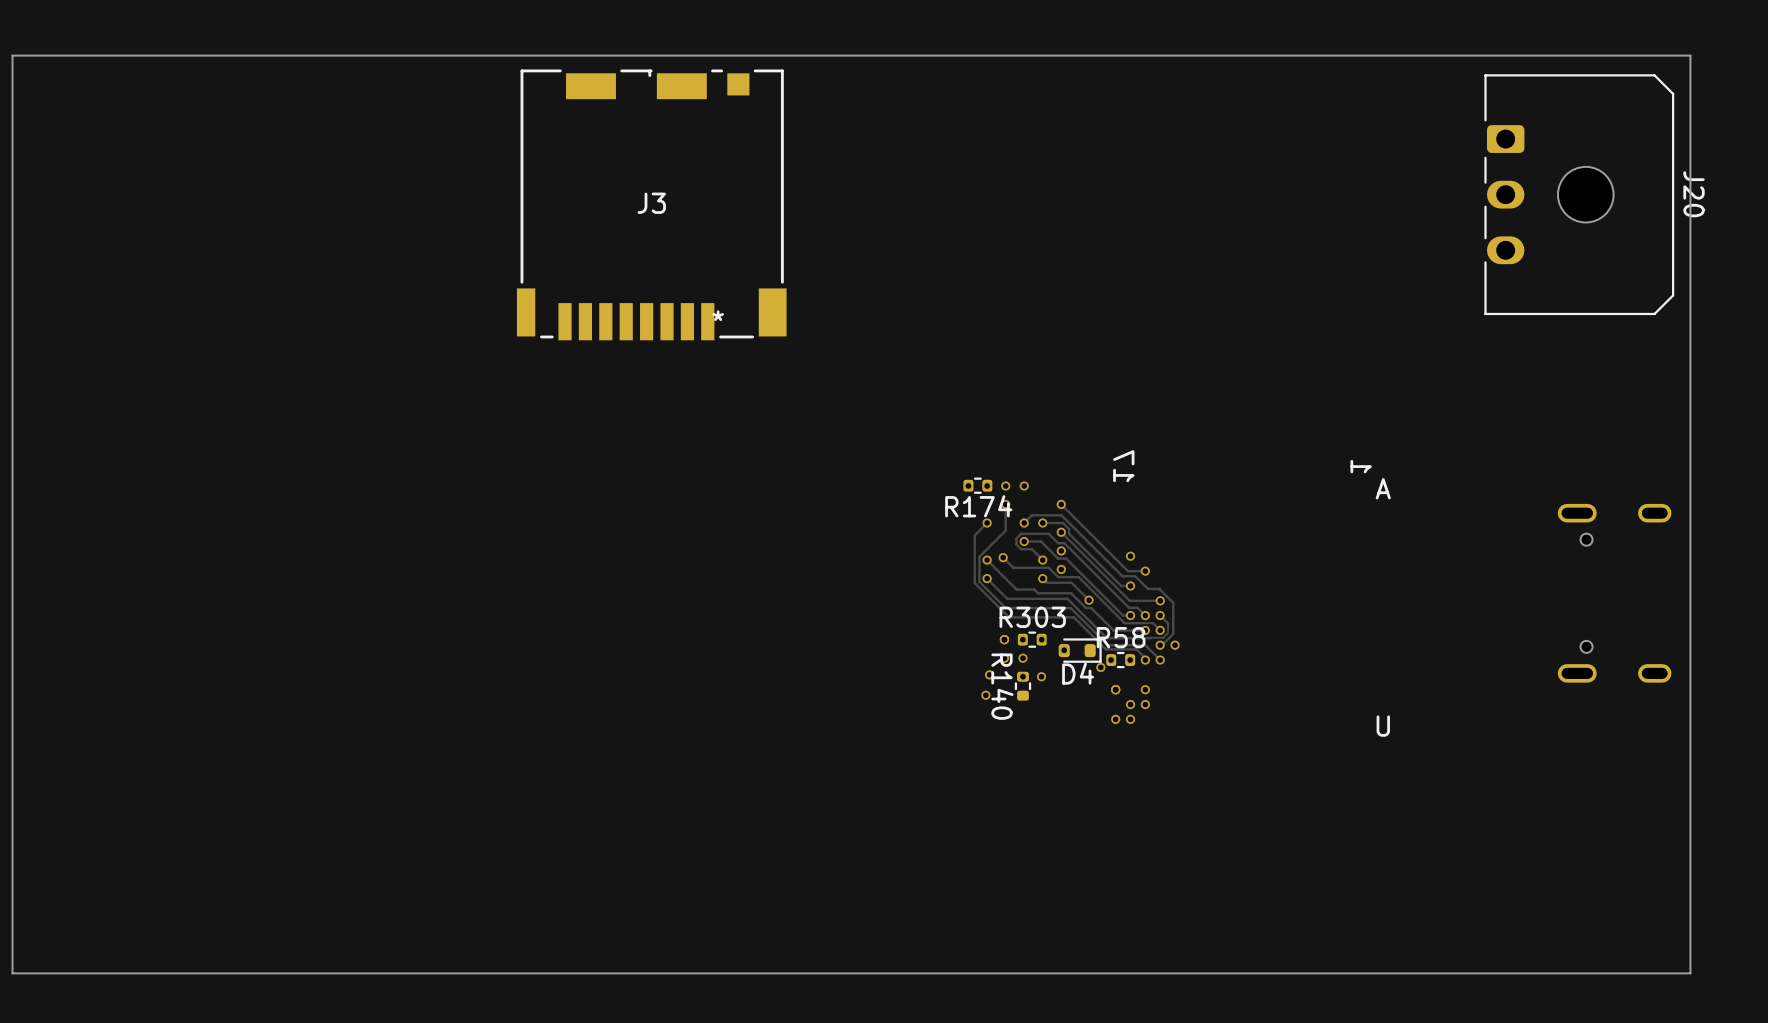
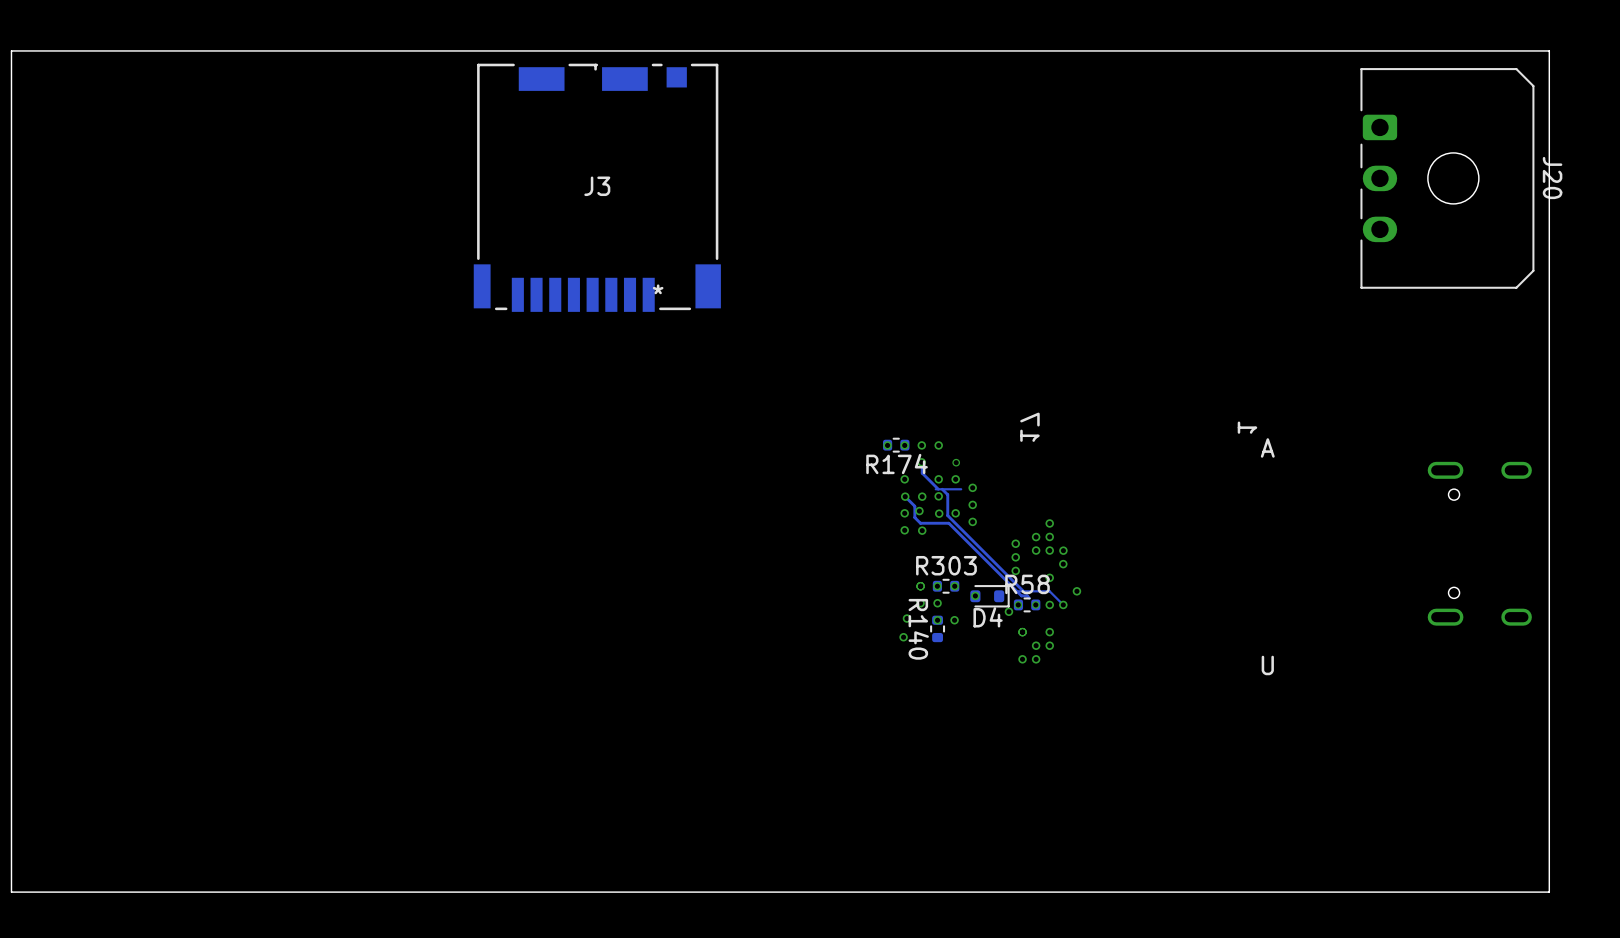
track: (1005, 504) (1005, 530) (979, 556) (979, 581) (1005, 608) (1070, 608) (1107, 645) -> (922, 462) (922, 473) (938, 489)
via: none -> (956, 462)
track: (1061, 504) (1127, 571) (1145, 571) -> none
via: (1061, 504) -> none
track: (987, 523) (974, 535) (974, 583) (1008, 617) (1073, 617) (1106, 649) (1136, 649) (1145, 658) -> none
track: (1024, 523) (1031, 515) (1061, 515) (1122, 576) (1135, 576) (1148, 588) (1159, 588) (1173, 602) (1173, 633) (1160, 645) -> none
track: (1042, 523) (1063, 523) (1069, 529) (1069, 533) (1121, 585) (1130, 585) -> none
track: (1061, 532) (1129, 600) (1160, 600) -> none
track: (1021, 533) (1016, 538) (1016, 544) (1021, 549) (1031, 549) (1042, 560) -> none
track: none -> (942, 489) (947, 494) (947, 515) (1023, 591)
track: (1048, 533) (1058, 543) (1064, 543) (1129, 607) (1137, 607) (1145, 615) -> none
track: none -> (905, 496) (914, 506) (914, 517) (920, 523) (948, 523) (1021, 595) (1027, 595) (1029, 598)
via: none -> (905, 496)
via: none -> (922, 496)
track: (1024, 541) (1041, 541) (1058, 558) (1066, 558) (1123, 615) (1130, 615) -> none
via: (1130, 556) -> none
track: (1003, 557) (1013, 567) (1048, 567) (1058, 577) (1078, 577) (1124, 623) (1141, 623) -> none
track: (987, 560) (1016, 589) (1034, 589) (1038, 593) (1071, 593) (1086, 608) (1091, 608) (1113, 630) (1145, 630) -> none
via: none -> (939, 513)
track: (987, 578) (1007, 598) (1067, 598) (1106, 638) (1163, 637) (1168, 633) (1168, 623) (1160, 615) -> none
via: none -> (922, 530)
track: (1042, 578) (1046, 582) (1071, 582) (1089, 600) -> none
via: (1042, 578) -> none
via: none -> (1049, 536)
via: none -> (1015, 543)
via: (1089, 600) -> none
via: none -> (1036, 550)
via: none -> (1049, 550)
via: none -> (1015, 557)
via: (1130, 615) -> none
via: (1145, 615) -> none
via: none -> (1015, 570)
track: (1141, 623) (1152, 623) (1160, 630) -> none
via: (1160, 630) -> none
via: (1160, 645) -> none

